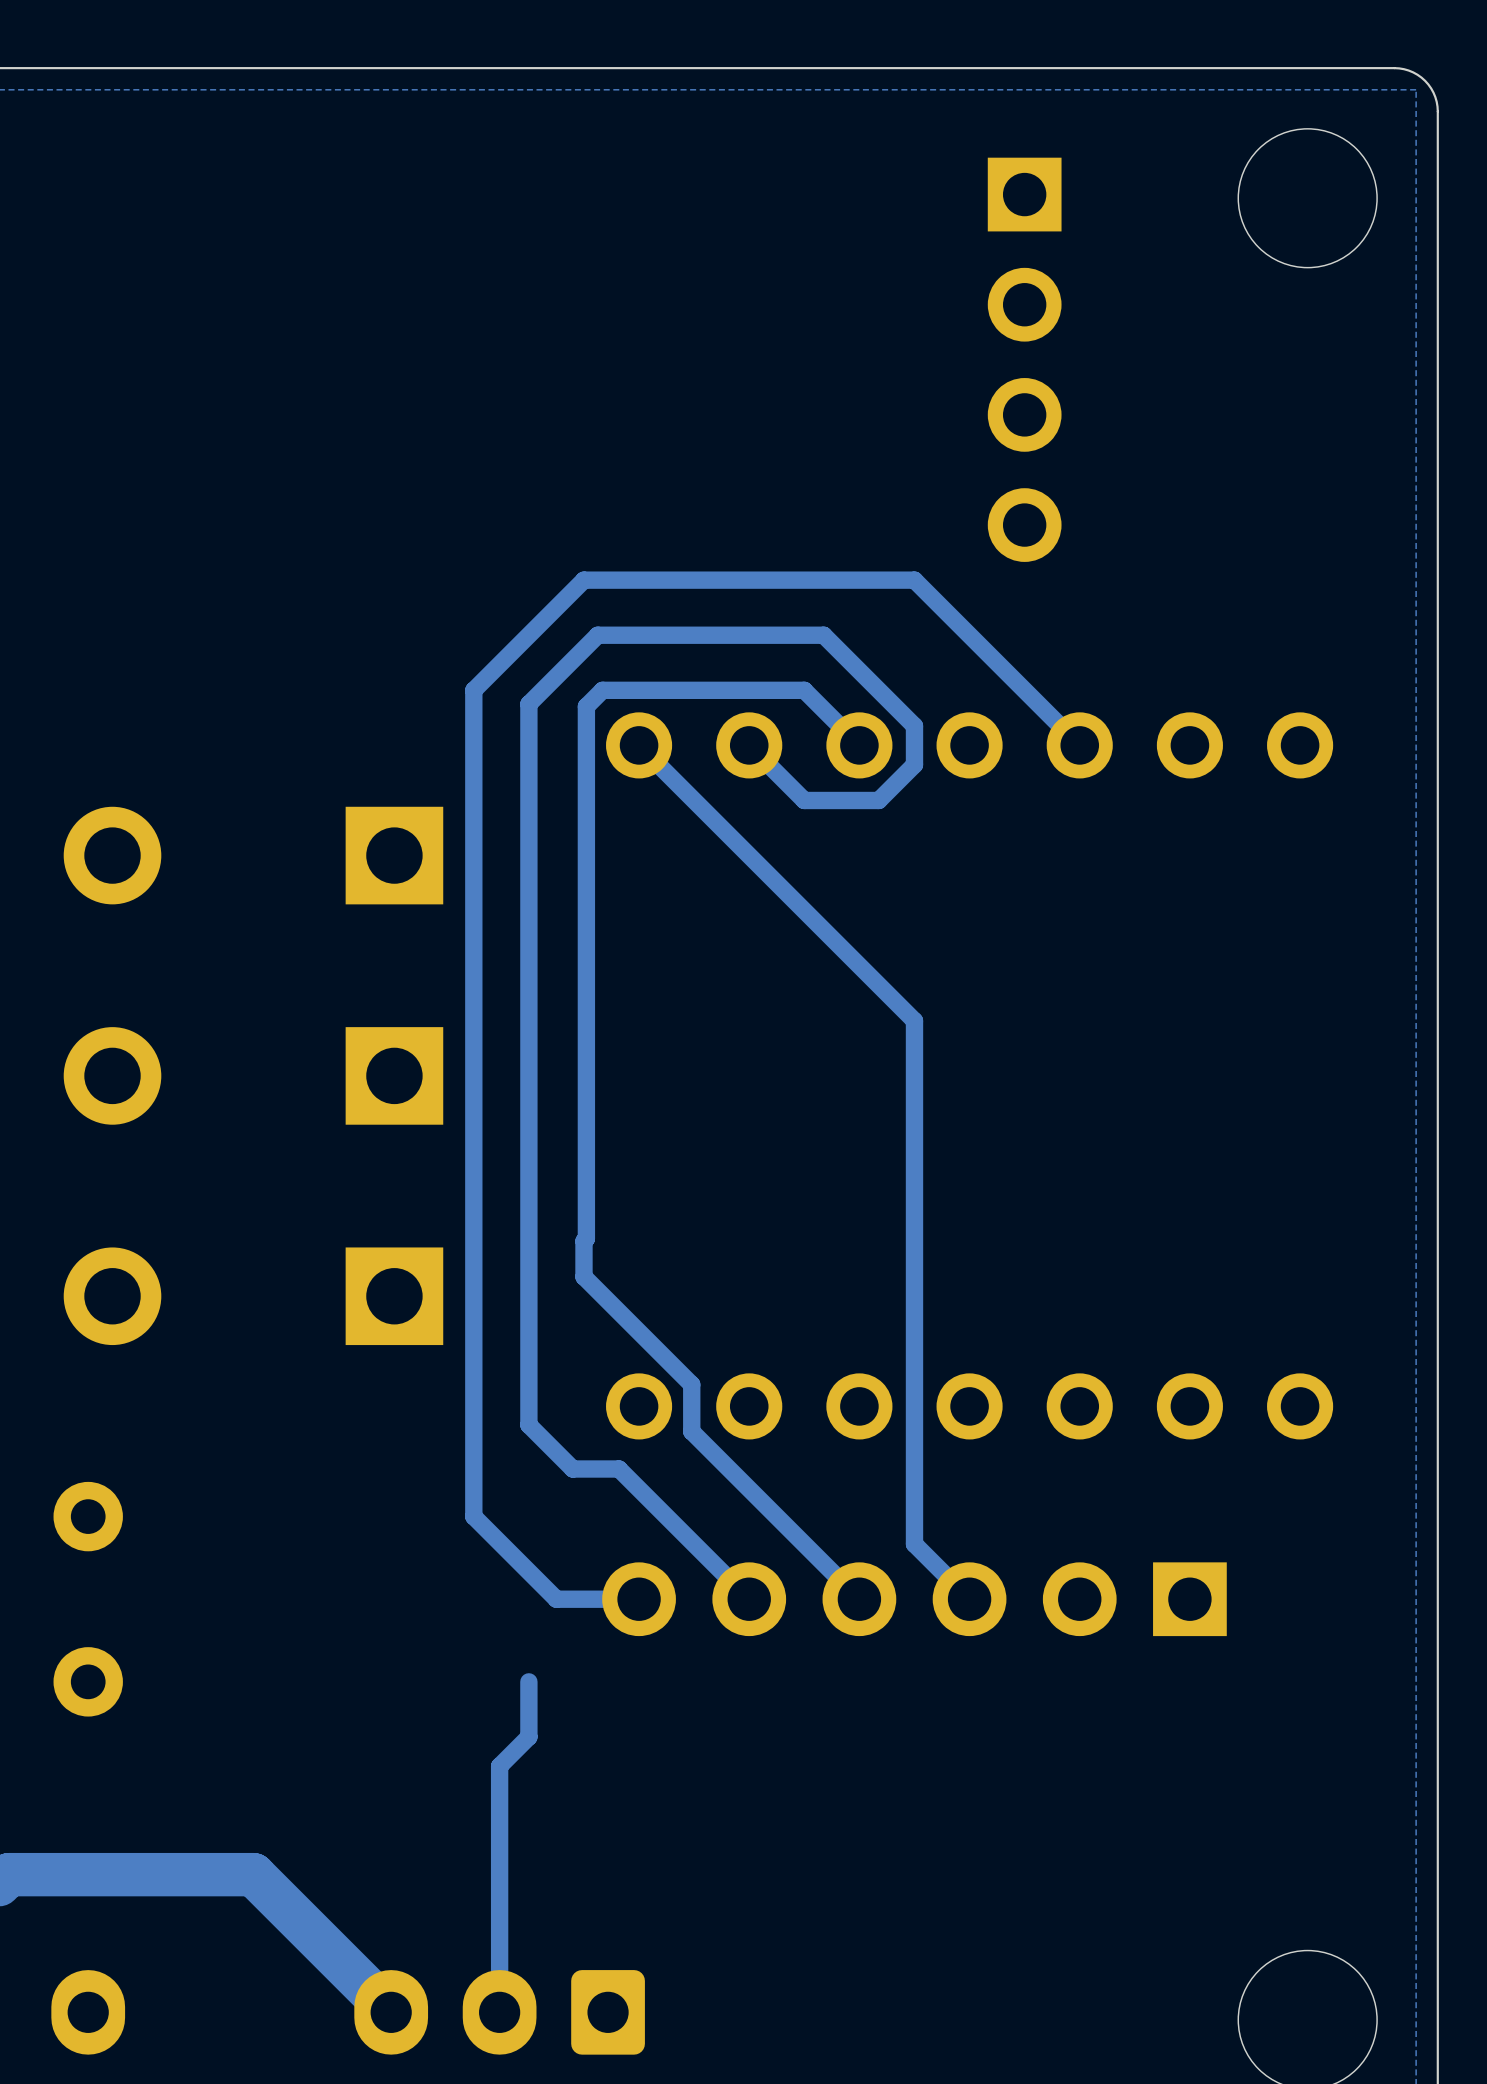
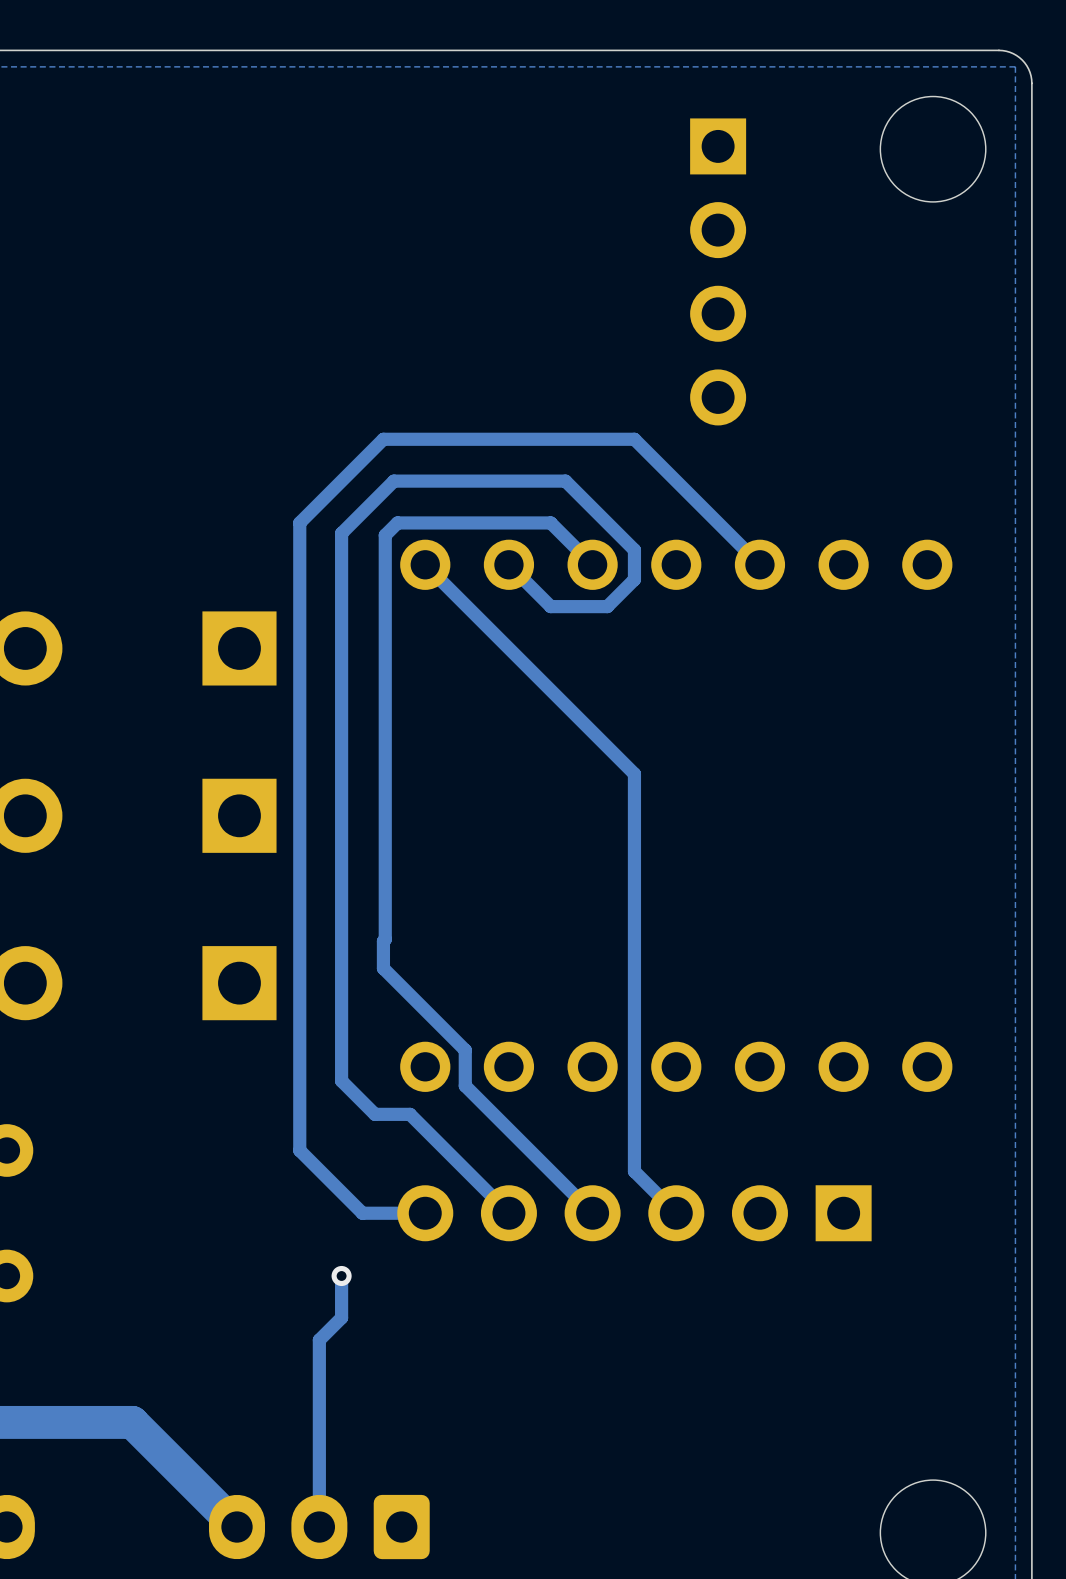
via: none -> (341, 1276)

